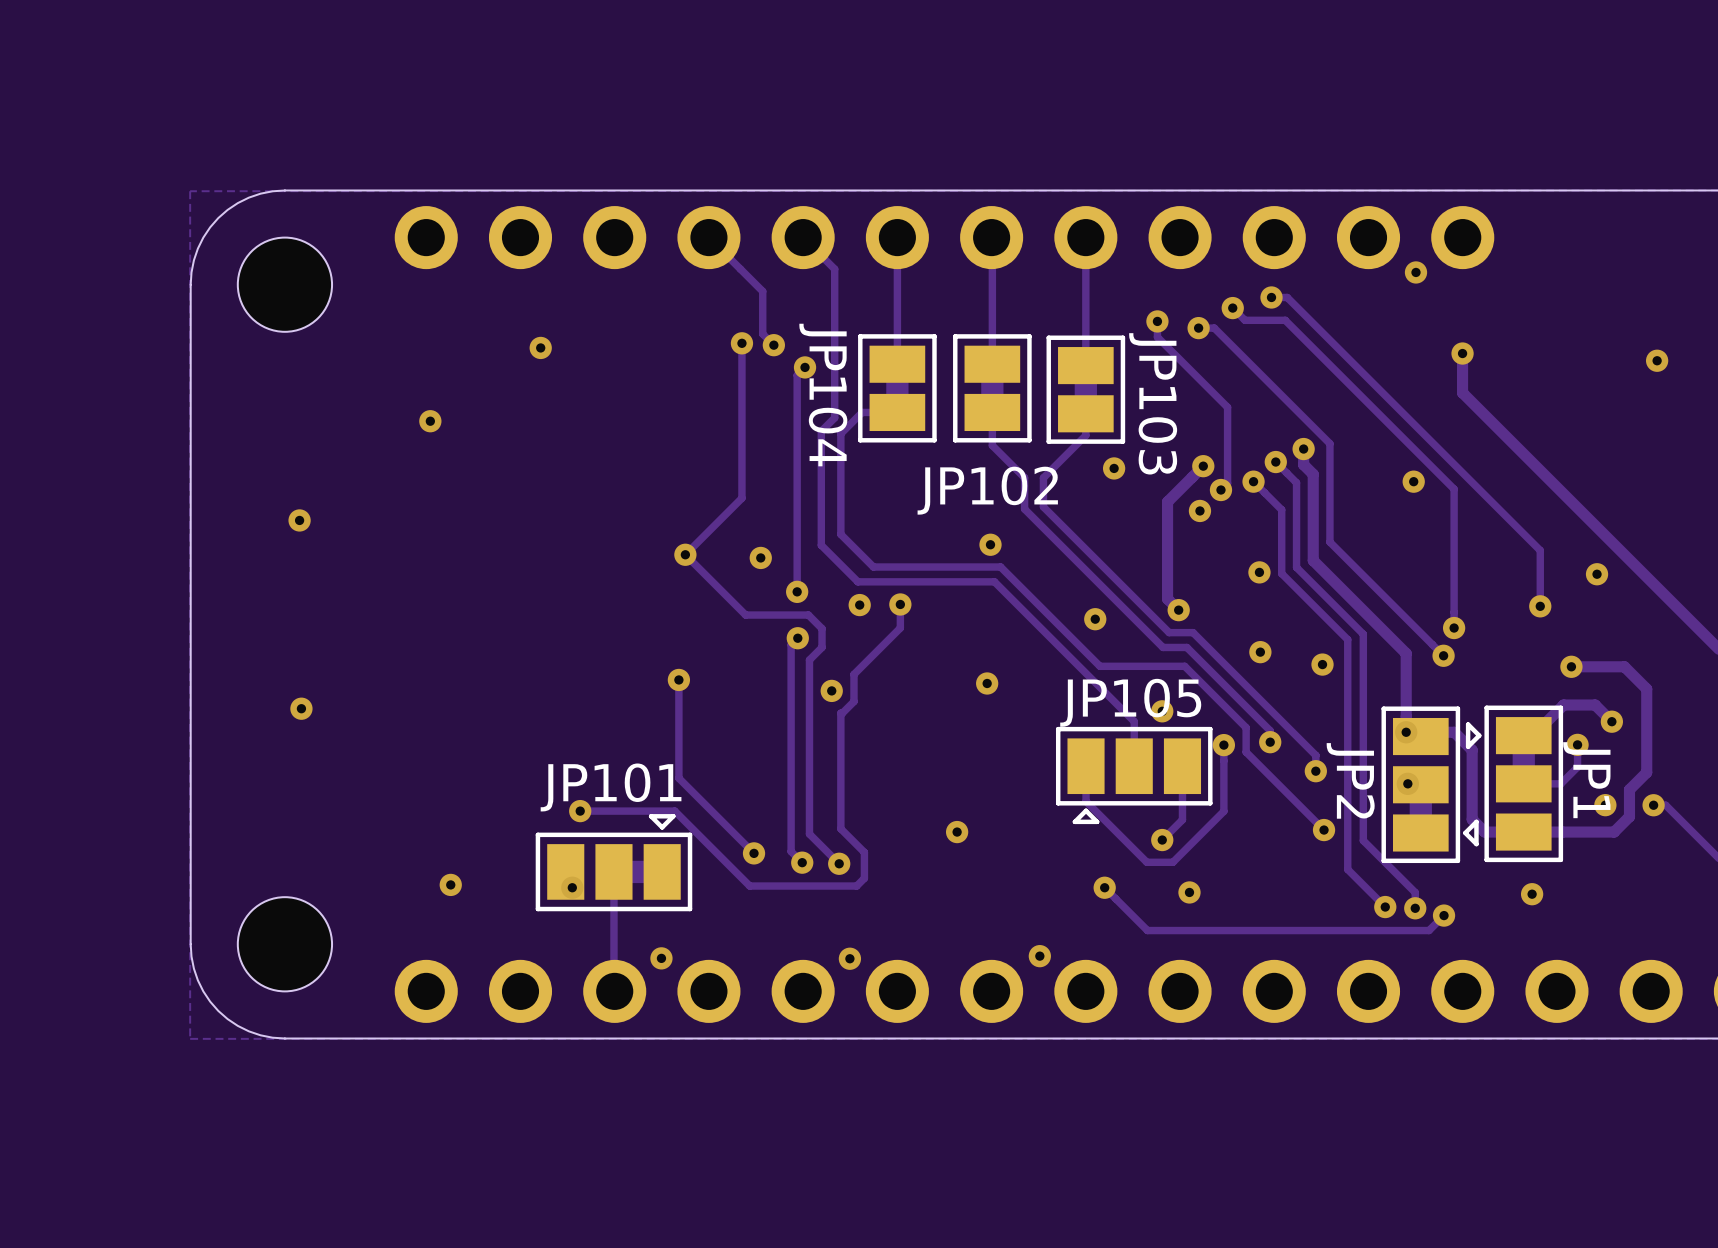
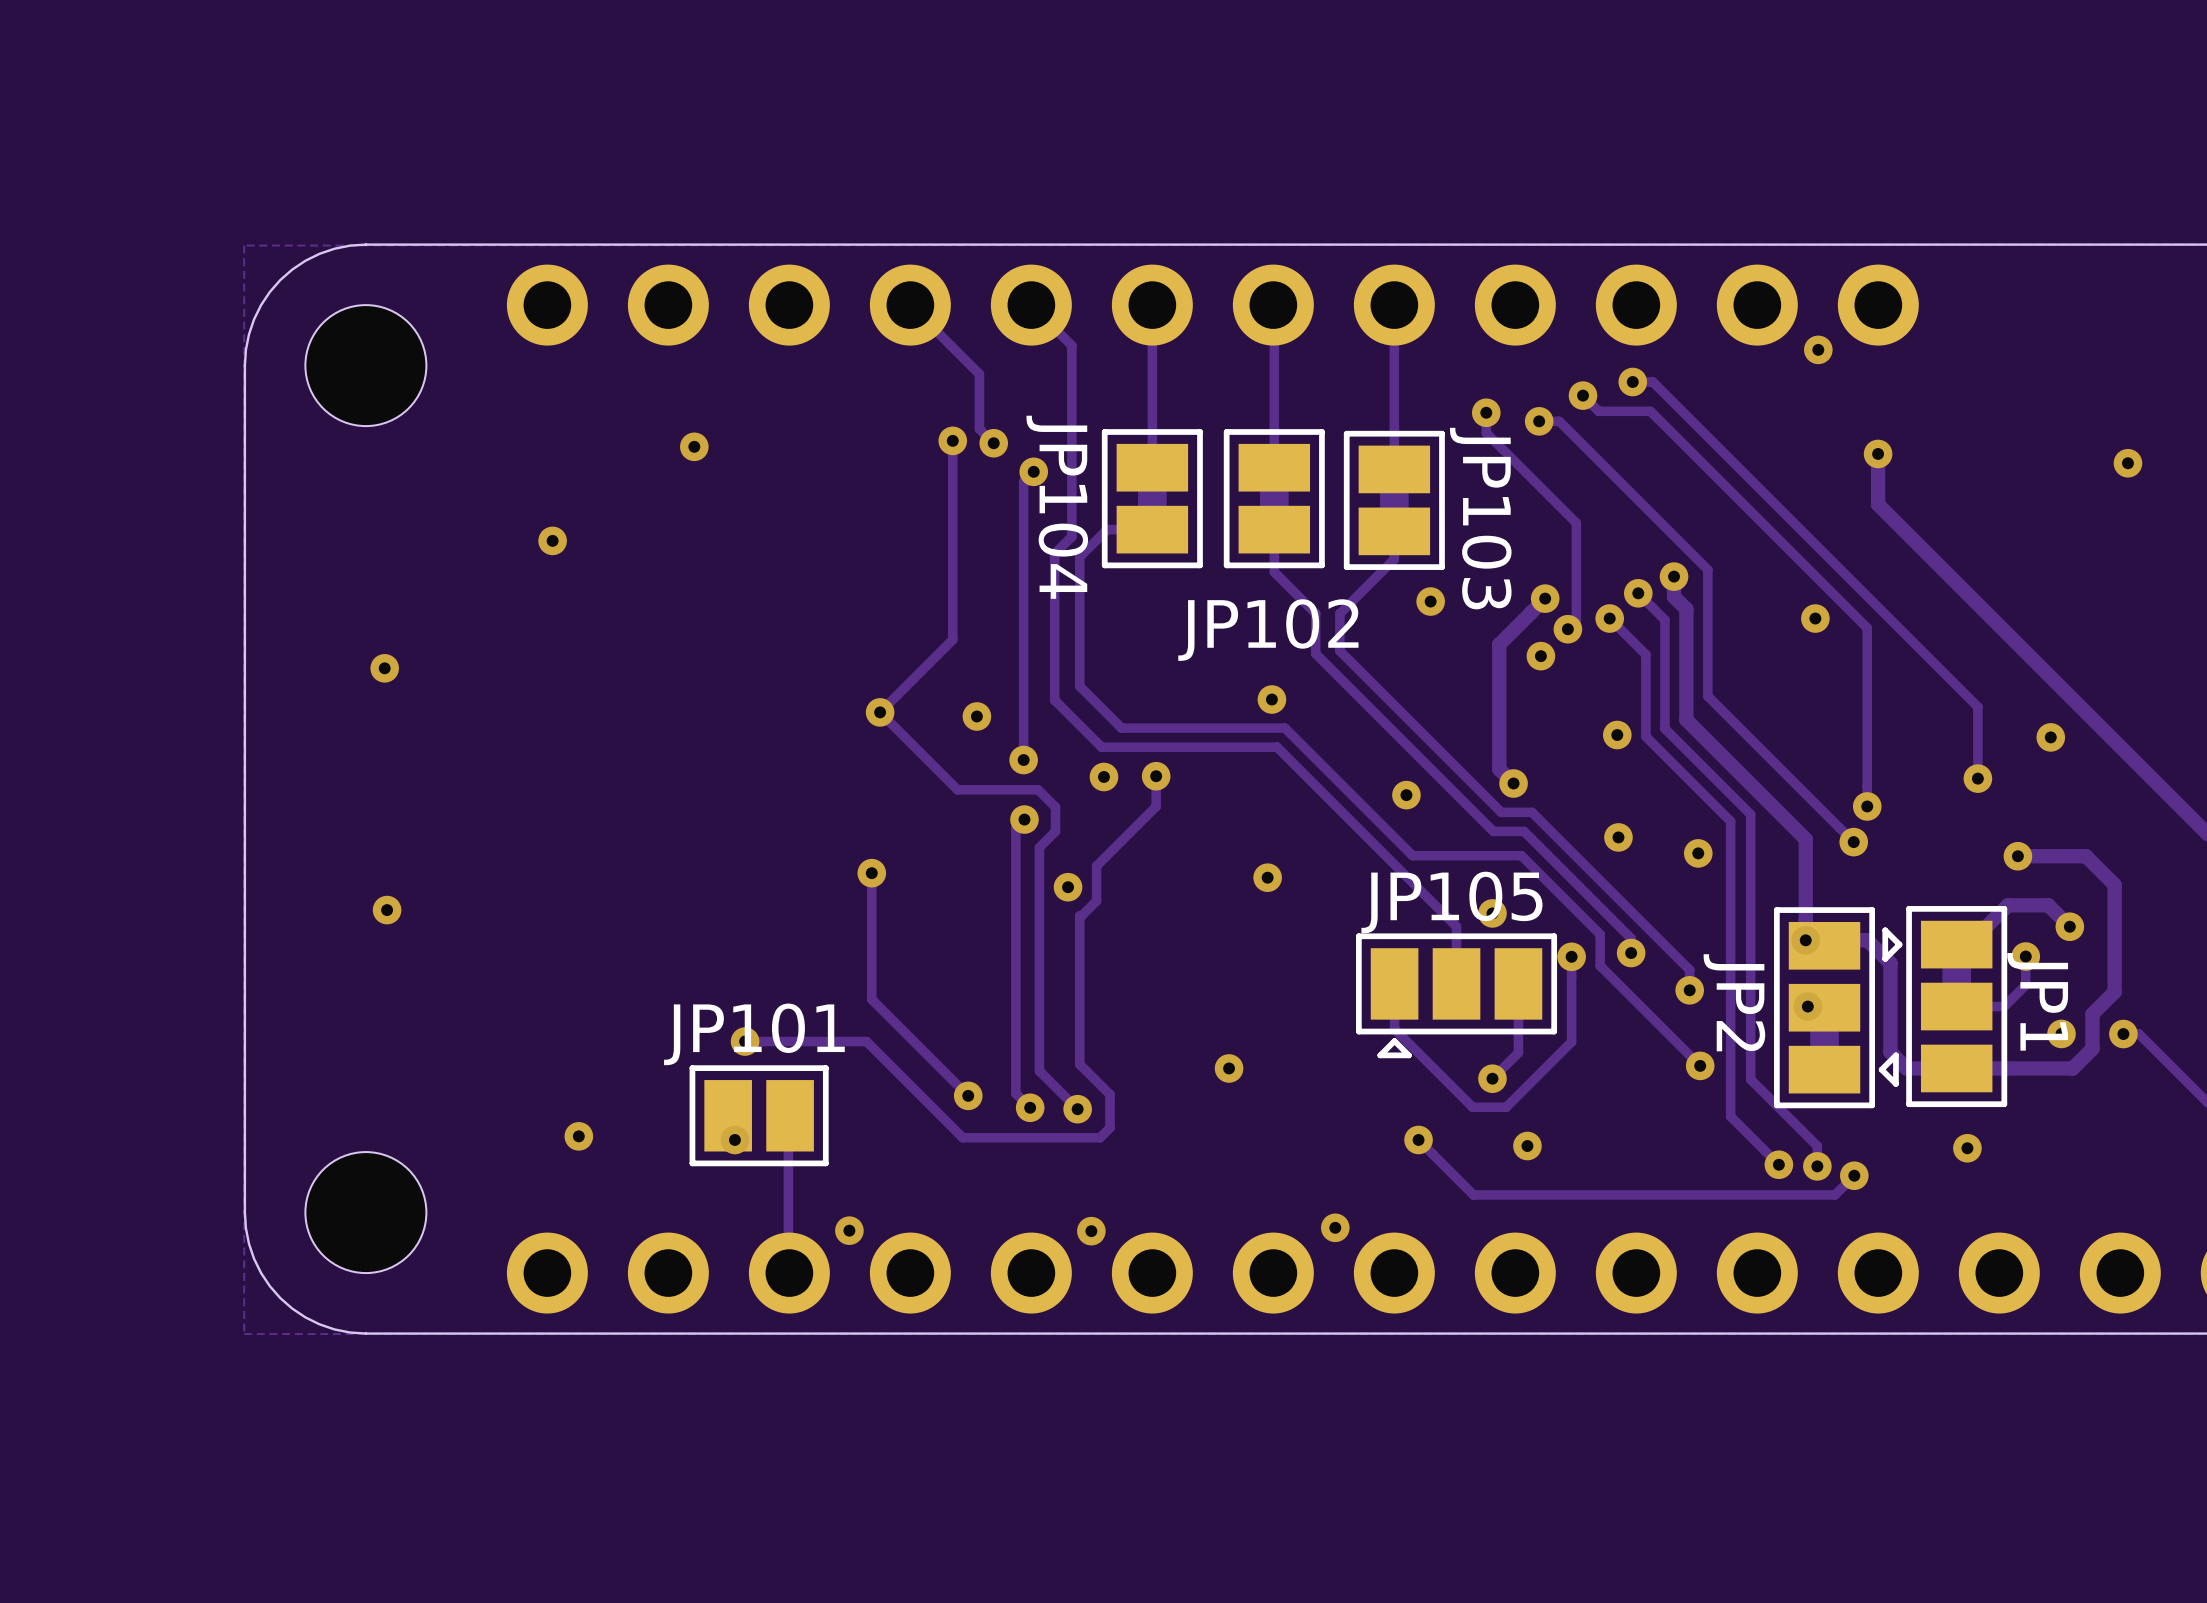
JP101 footprint: [535, 814, 693, 912] -> [689, 1065, 829, 1167]

